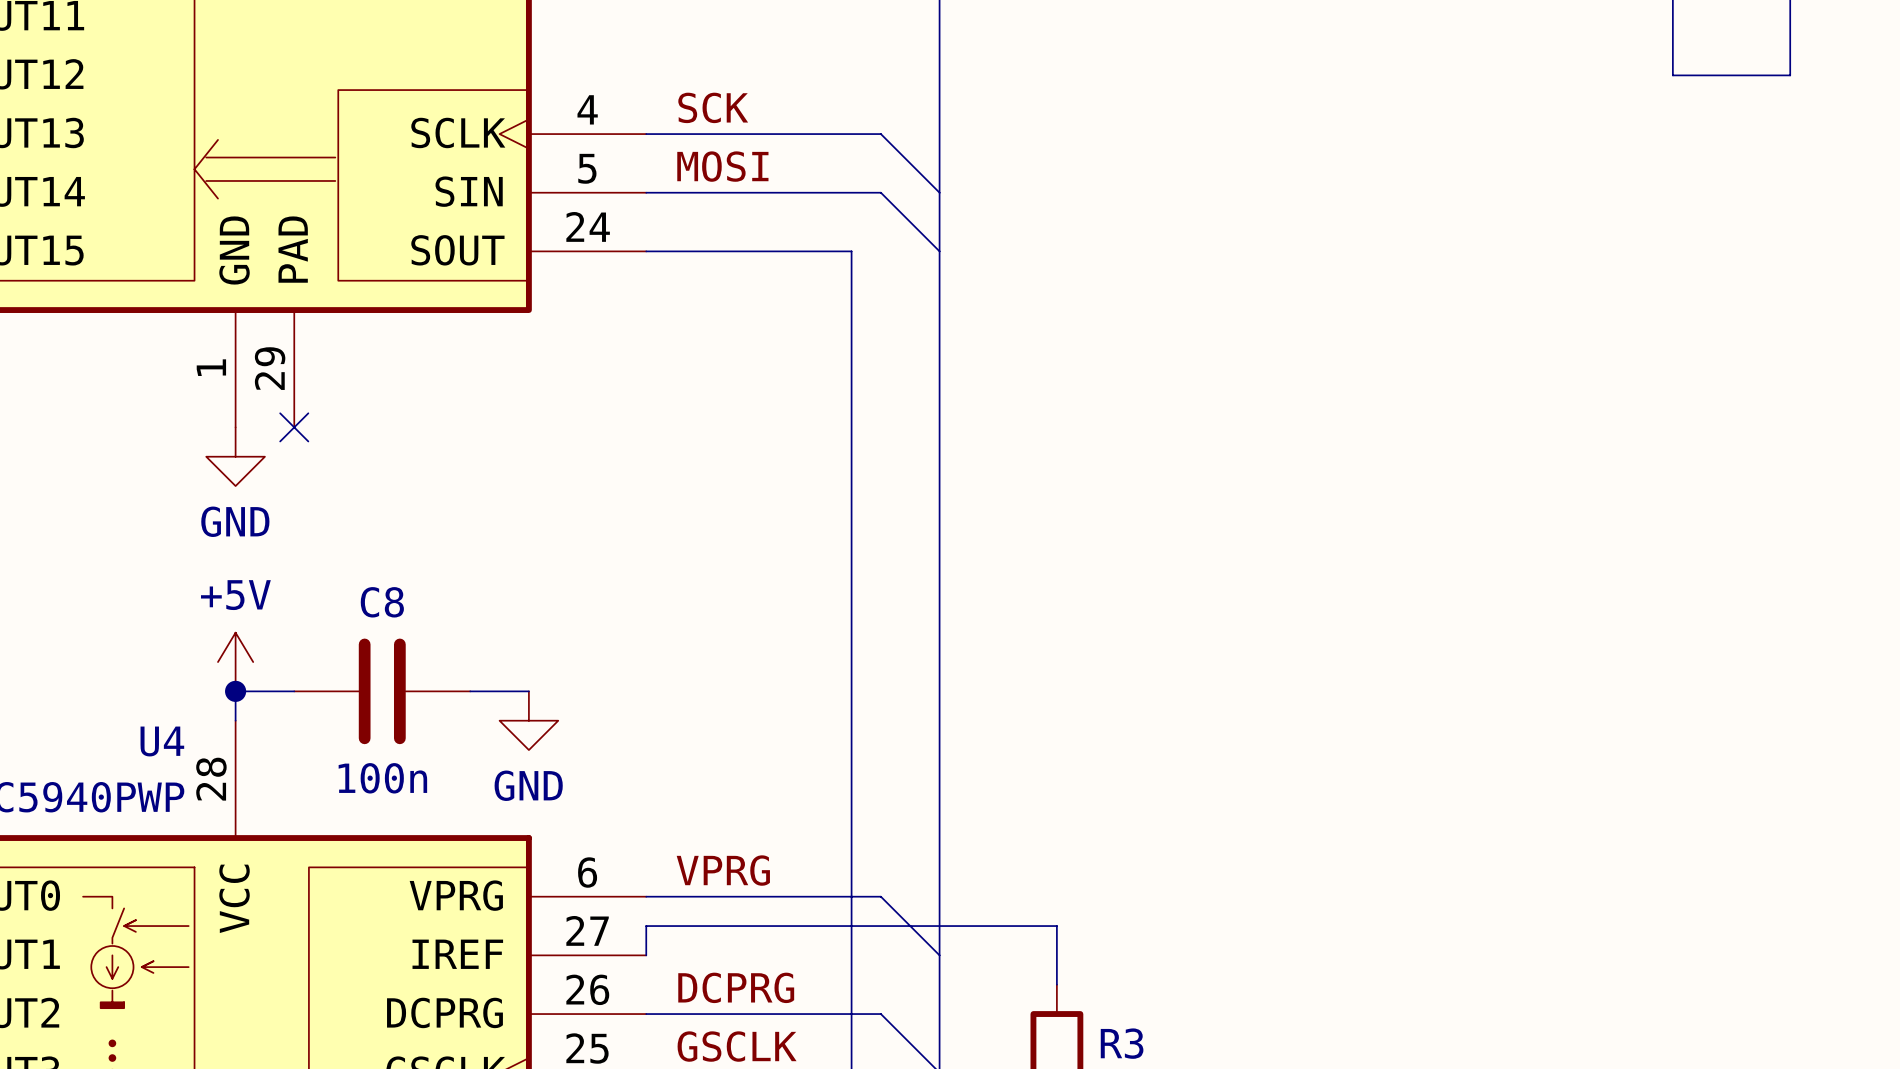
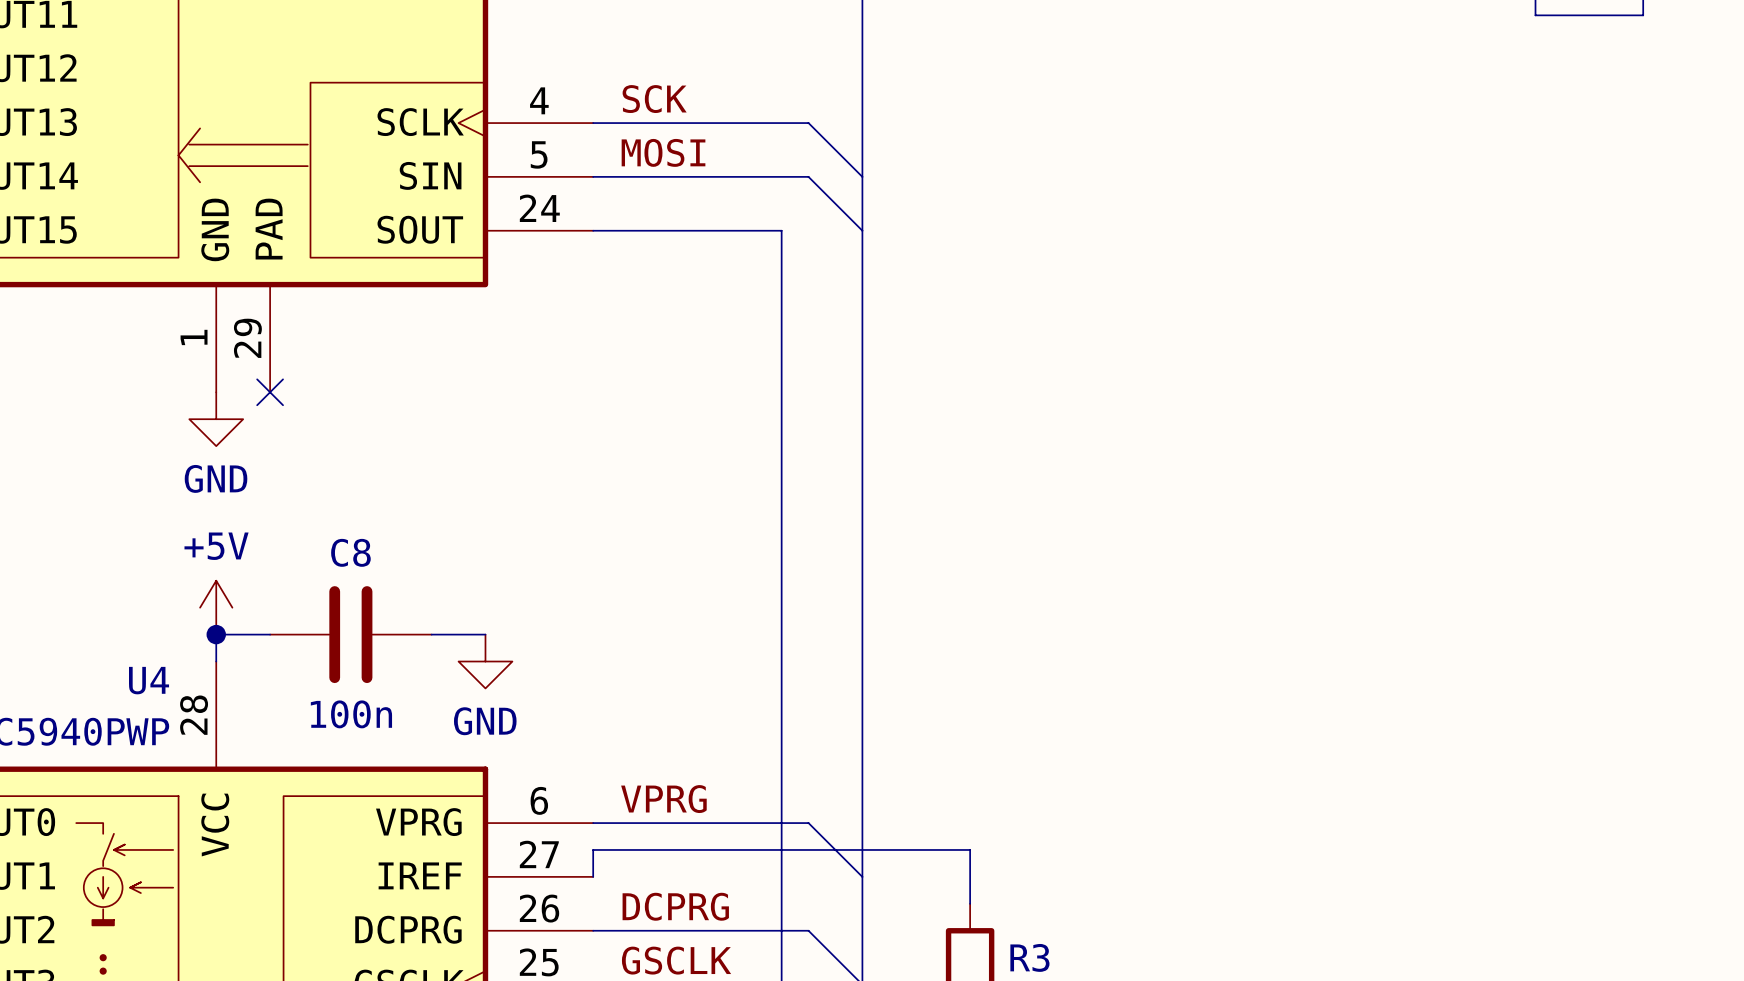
wire: (1672, 16) (1672, 75) (1790, 75) (1790, 16) -> (1535, 15) (1643, 15)

